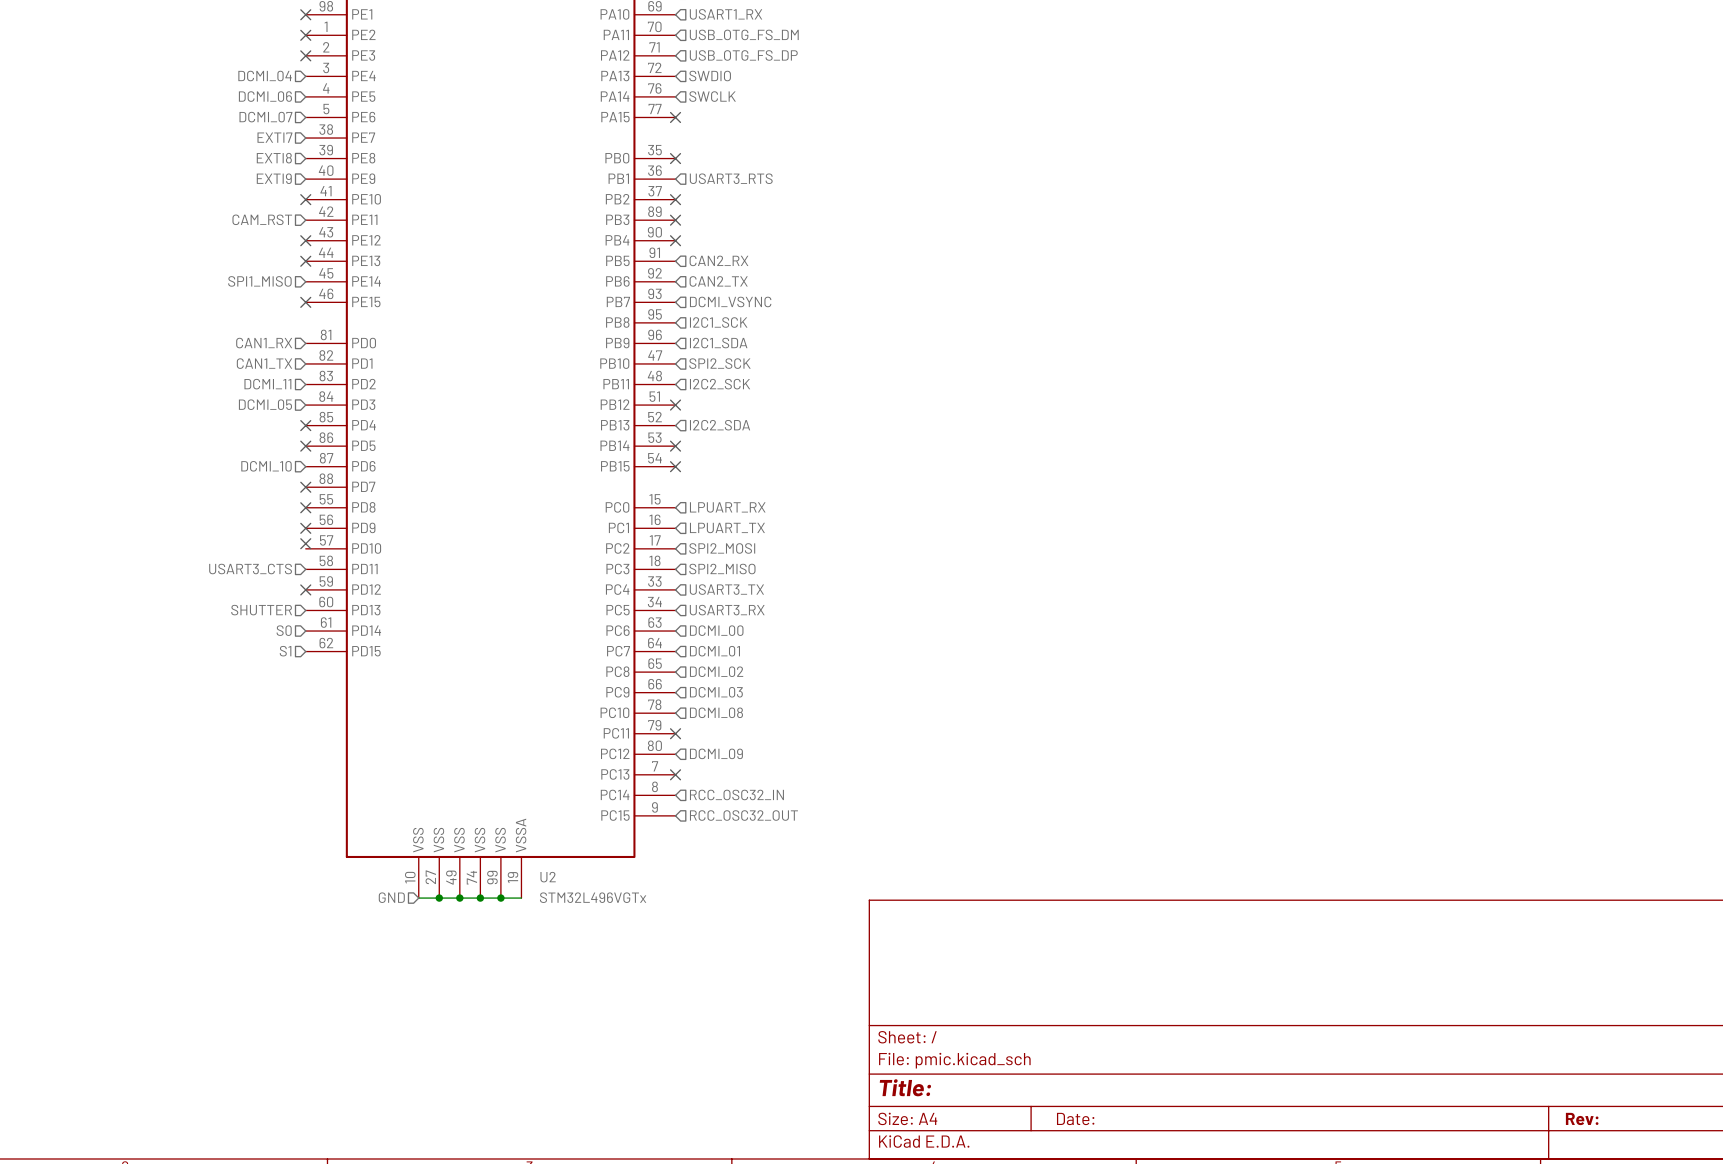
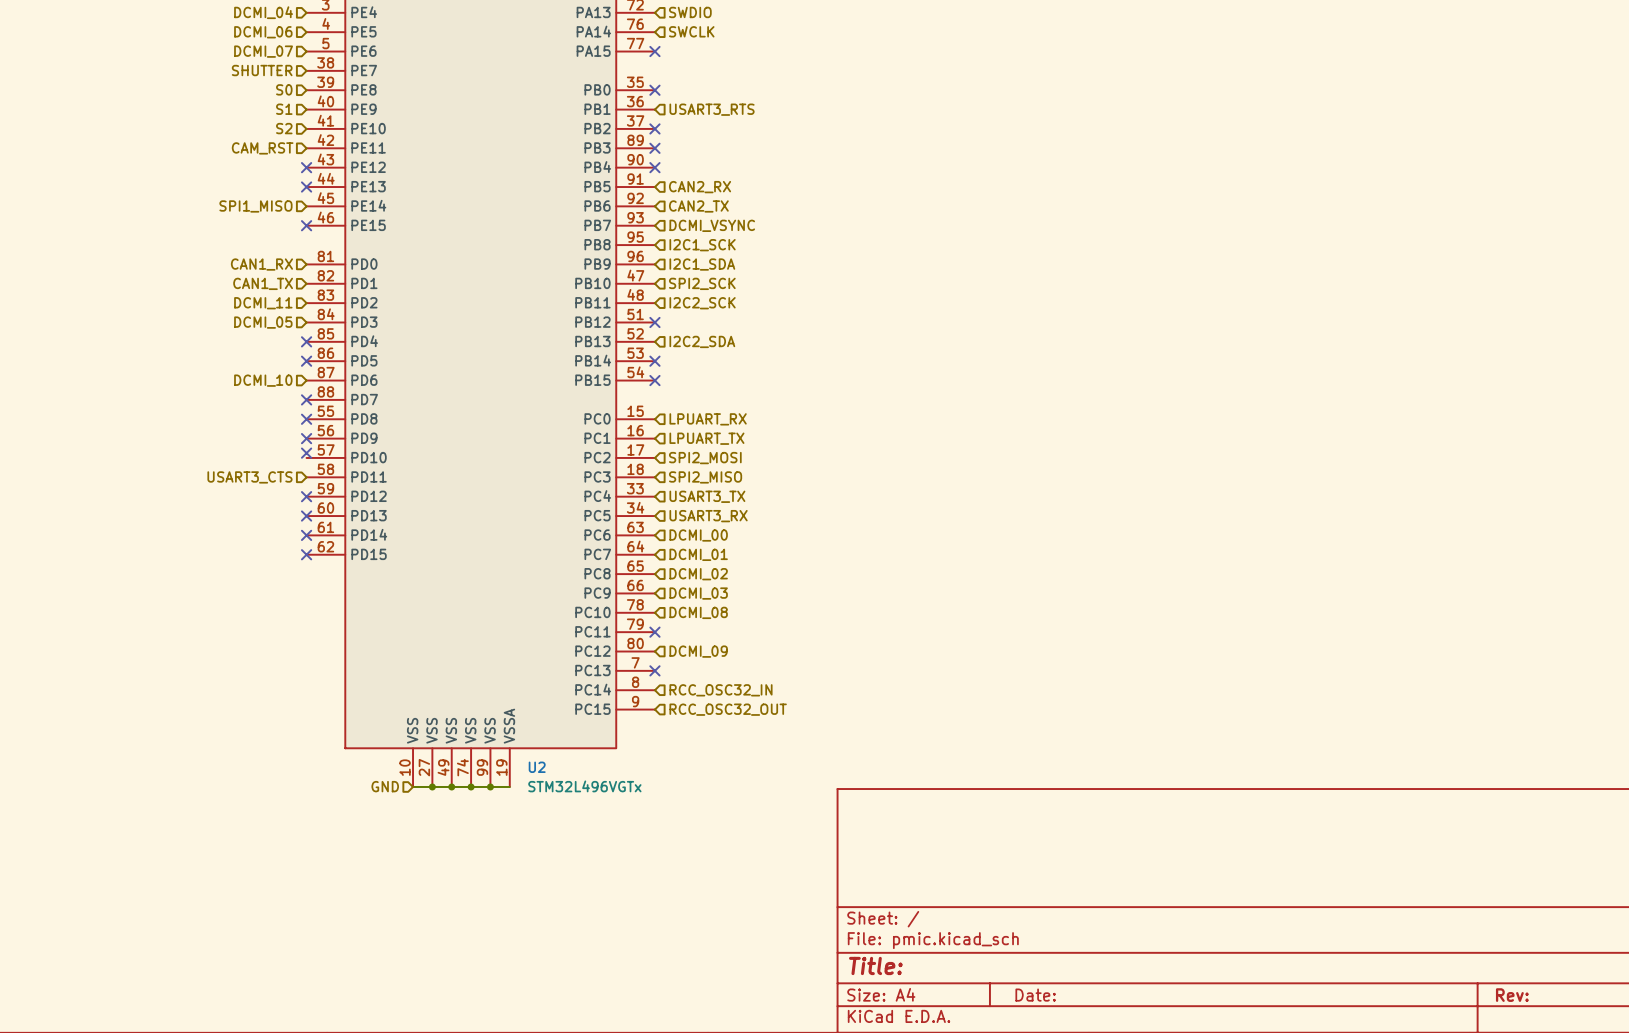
hierarchical label: EXTI7 (274, 137) -> SHUTTER (262, 70)
hierarchical label: EXTI8 (274, 158) -> S0 (284, 89)
hierarchical label: EXTI9 (274, 178) -> S1 (284, 109)
hierarchical label: none -> S2 (284, 128)
no-connect mark: (305, 199) -> none
hierarchical label: SHUTTER (261, 610) -> none
no-connect mark: none -> (306, 516)
hierarchical label: S0 (284, 630) -> none
no-connect mark: none -> (306, 535)
hierarchical label: S1 (285, 651) -> none
no-connect mark: none -> (306, 554)

